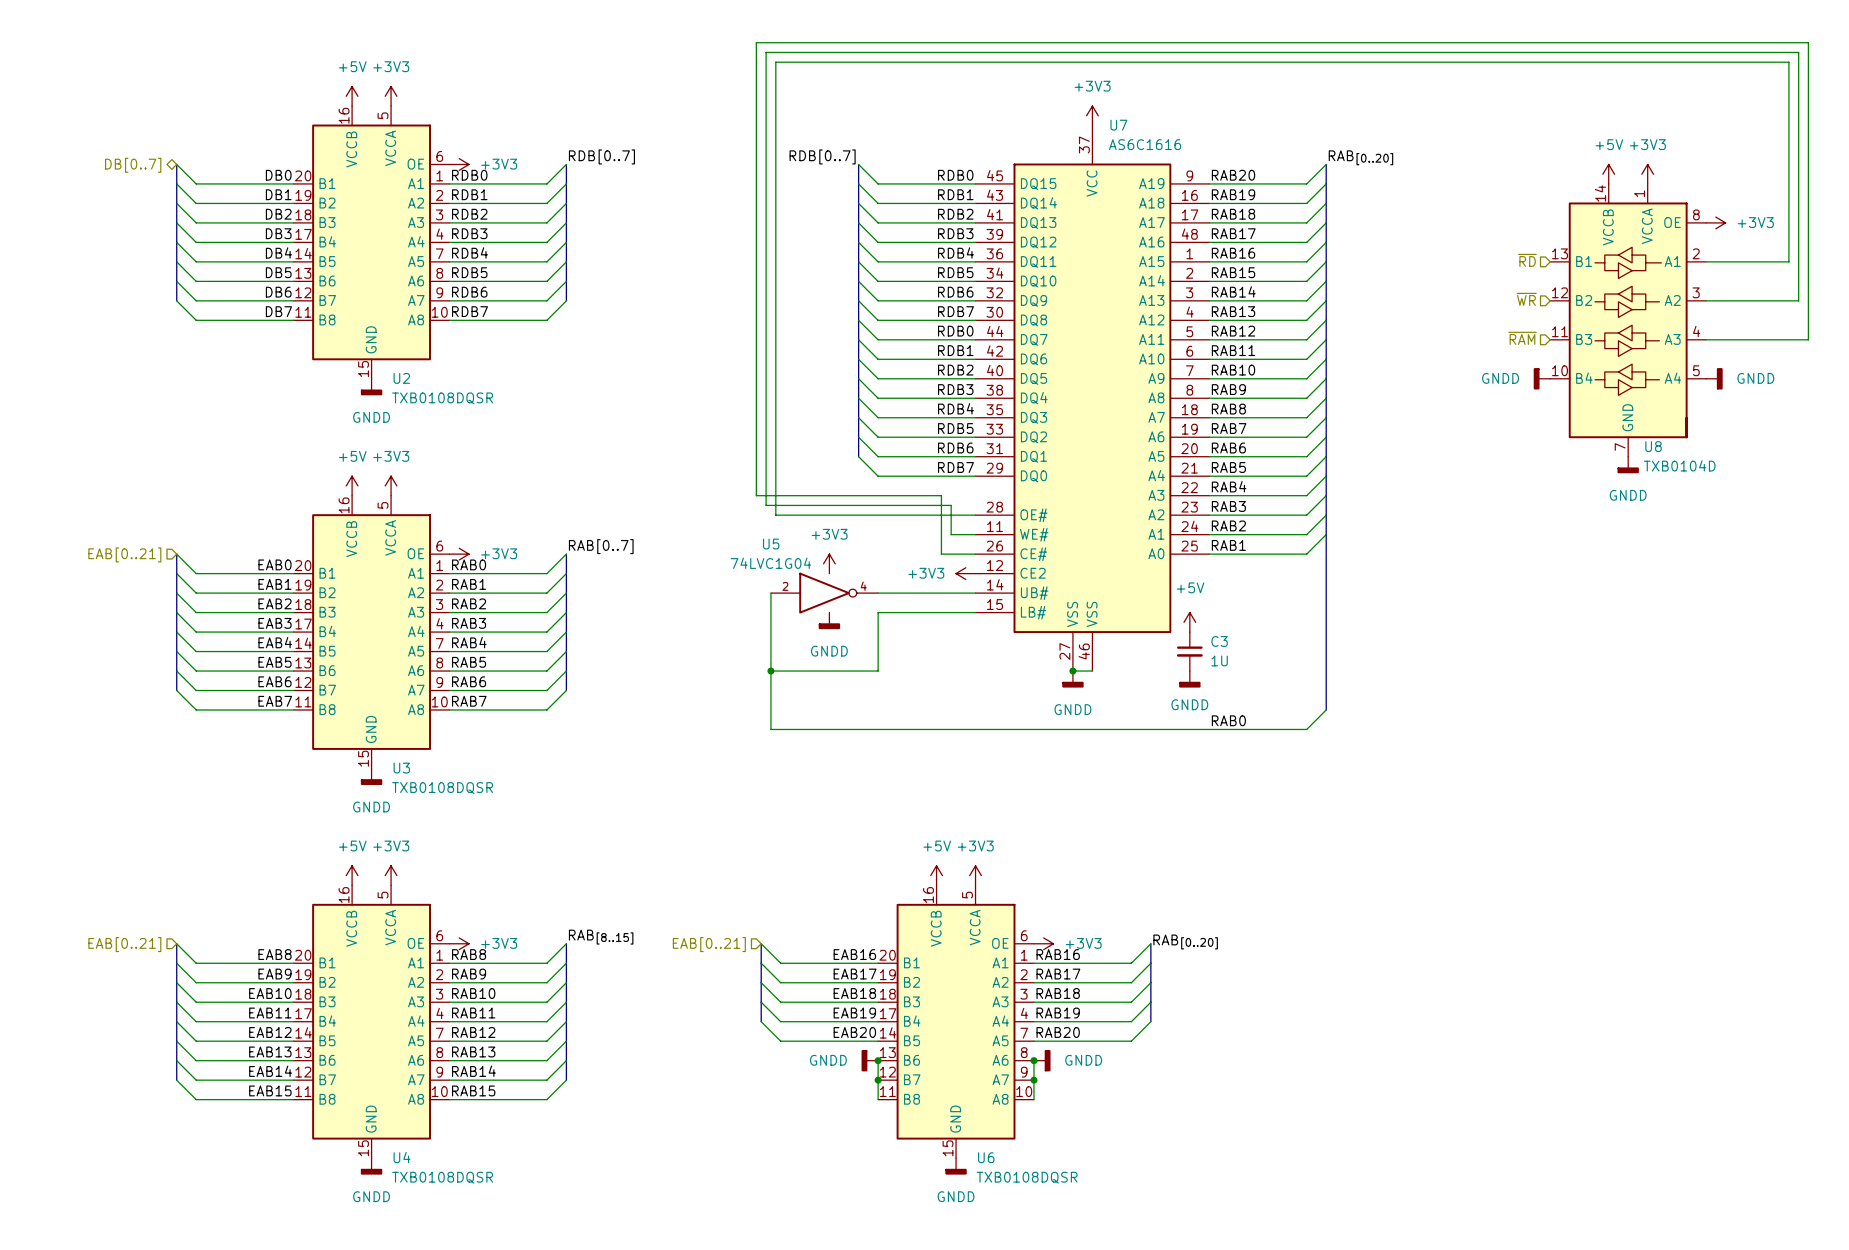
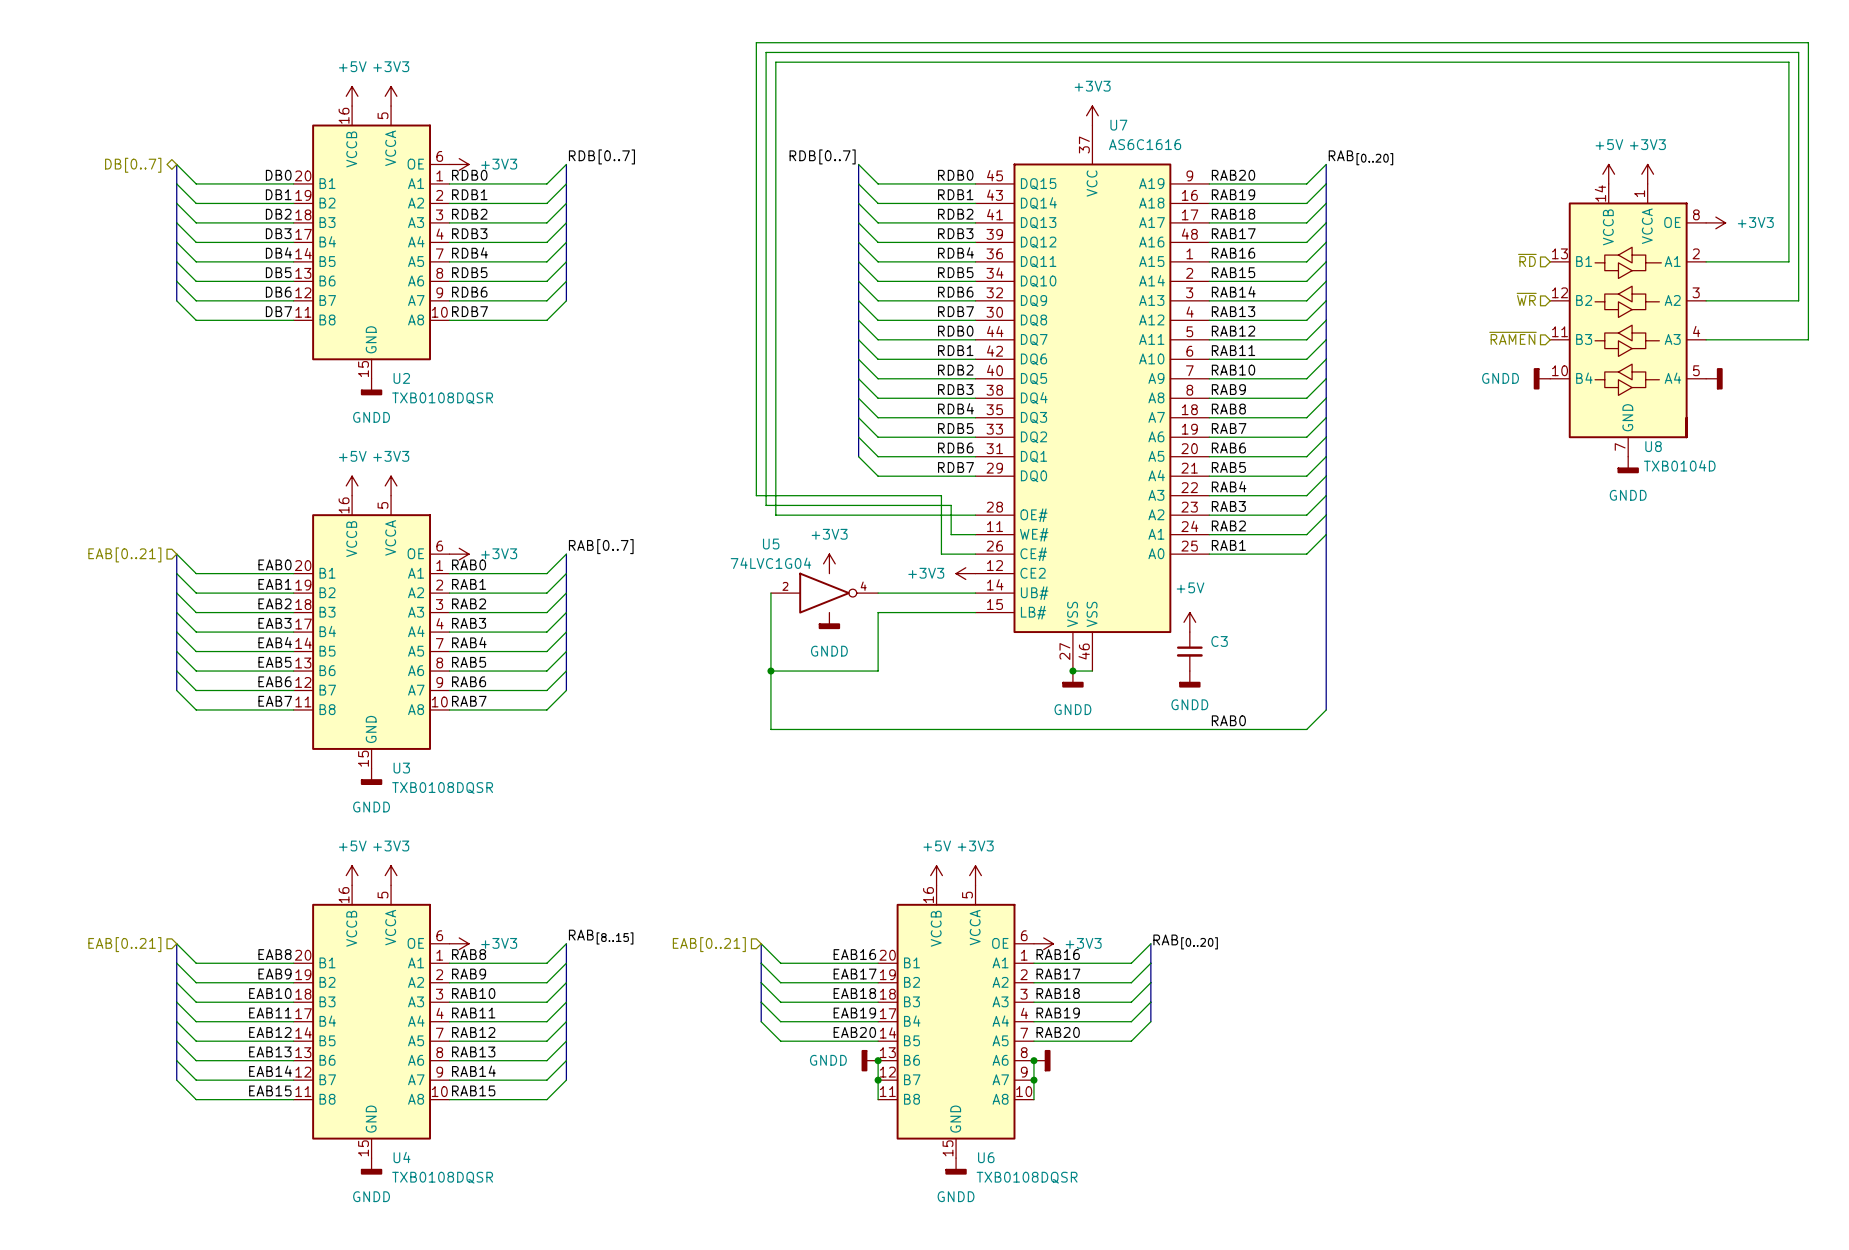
hierarchical label: ~{RAM} (1522, 338) -> ~{RAMEN} (1512, 338)
power symbol text: GNDD (1755, 378) -> none
C3 value: 1U (1219, 660) -> none
power symbol text: GNDD (1083, 1060) -> none

